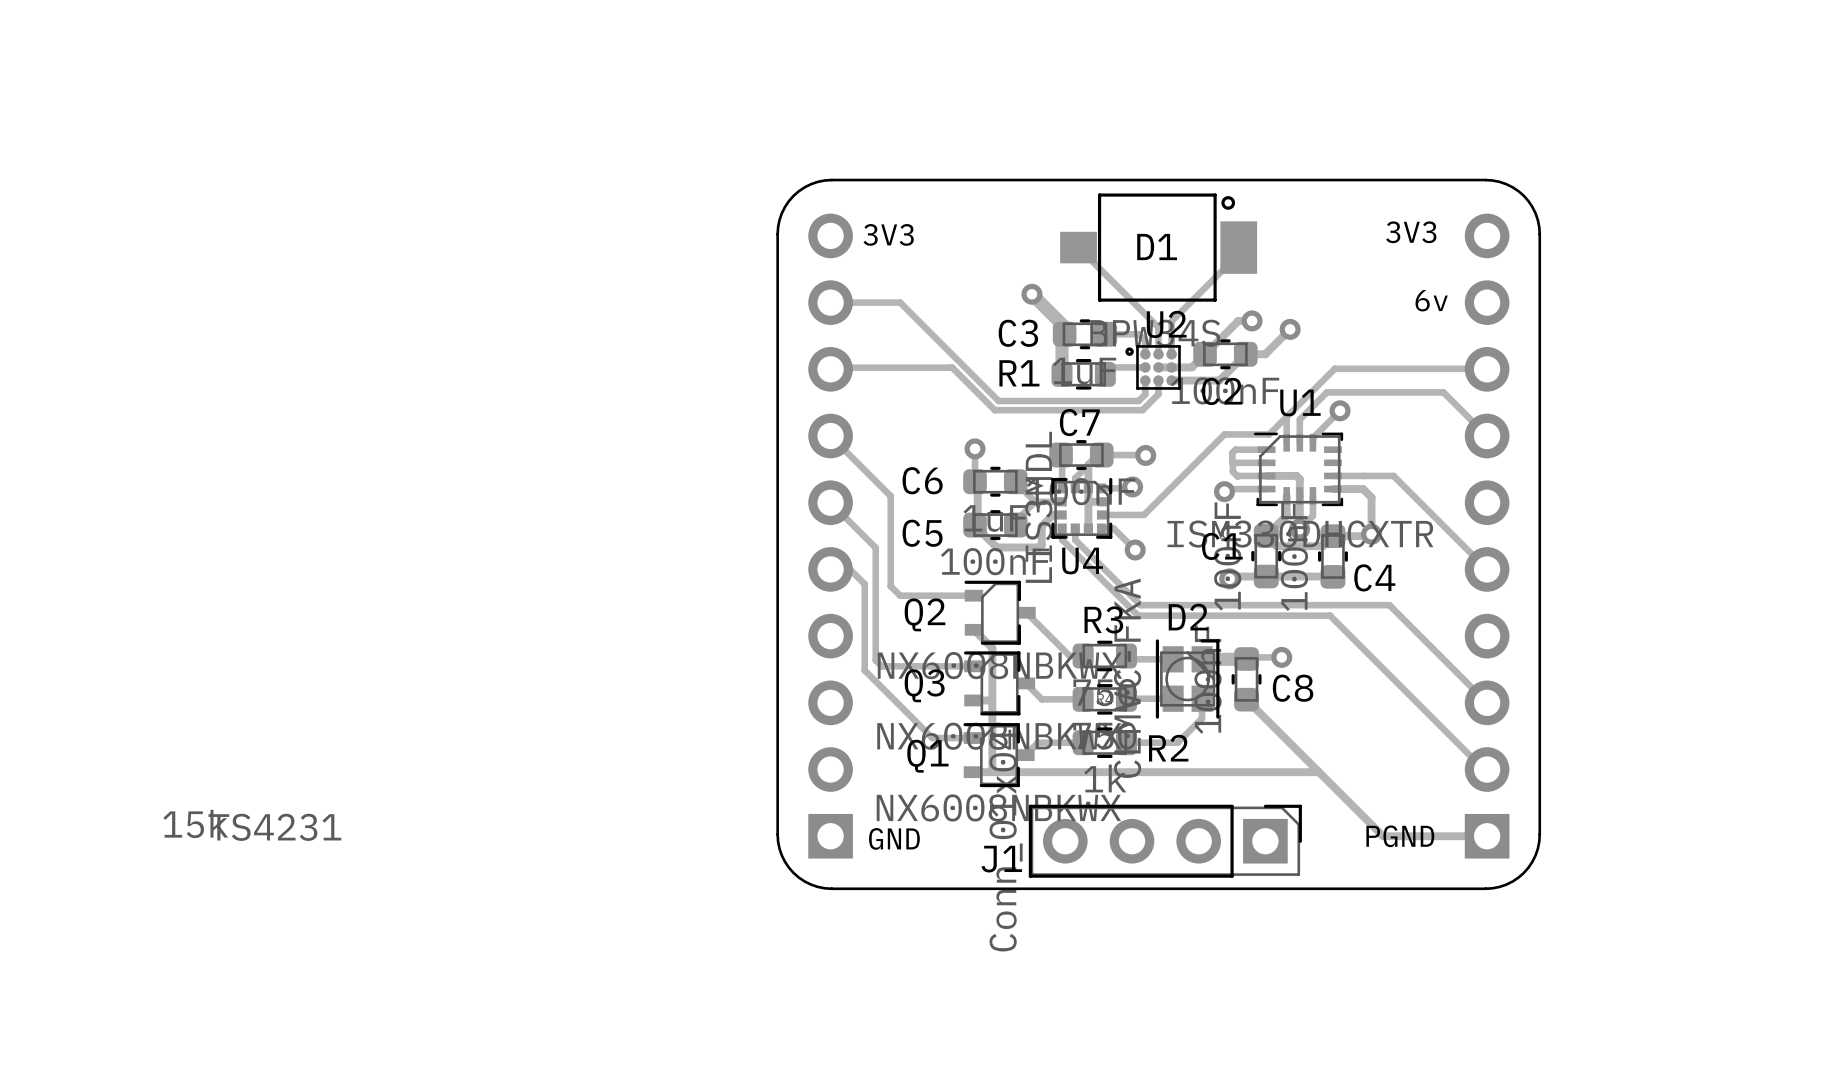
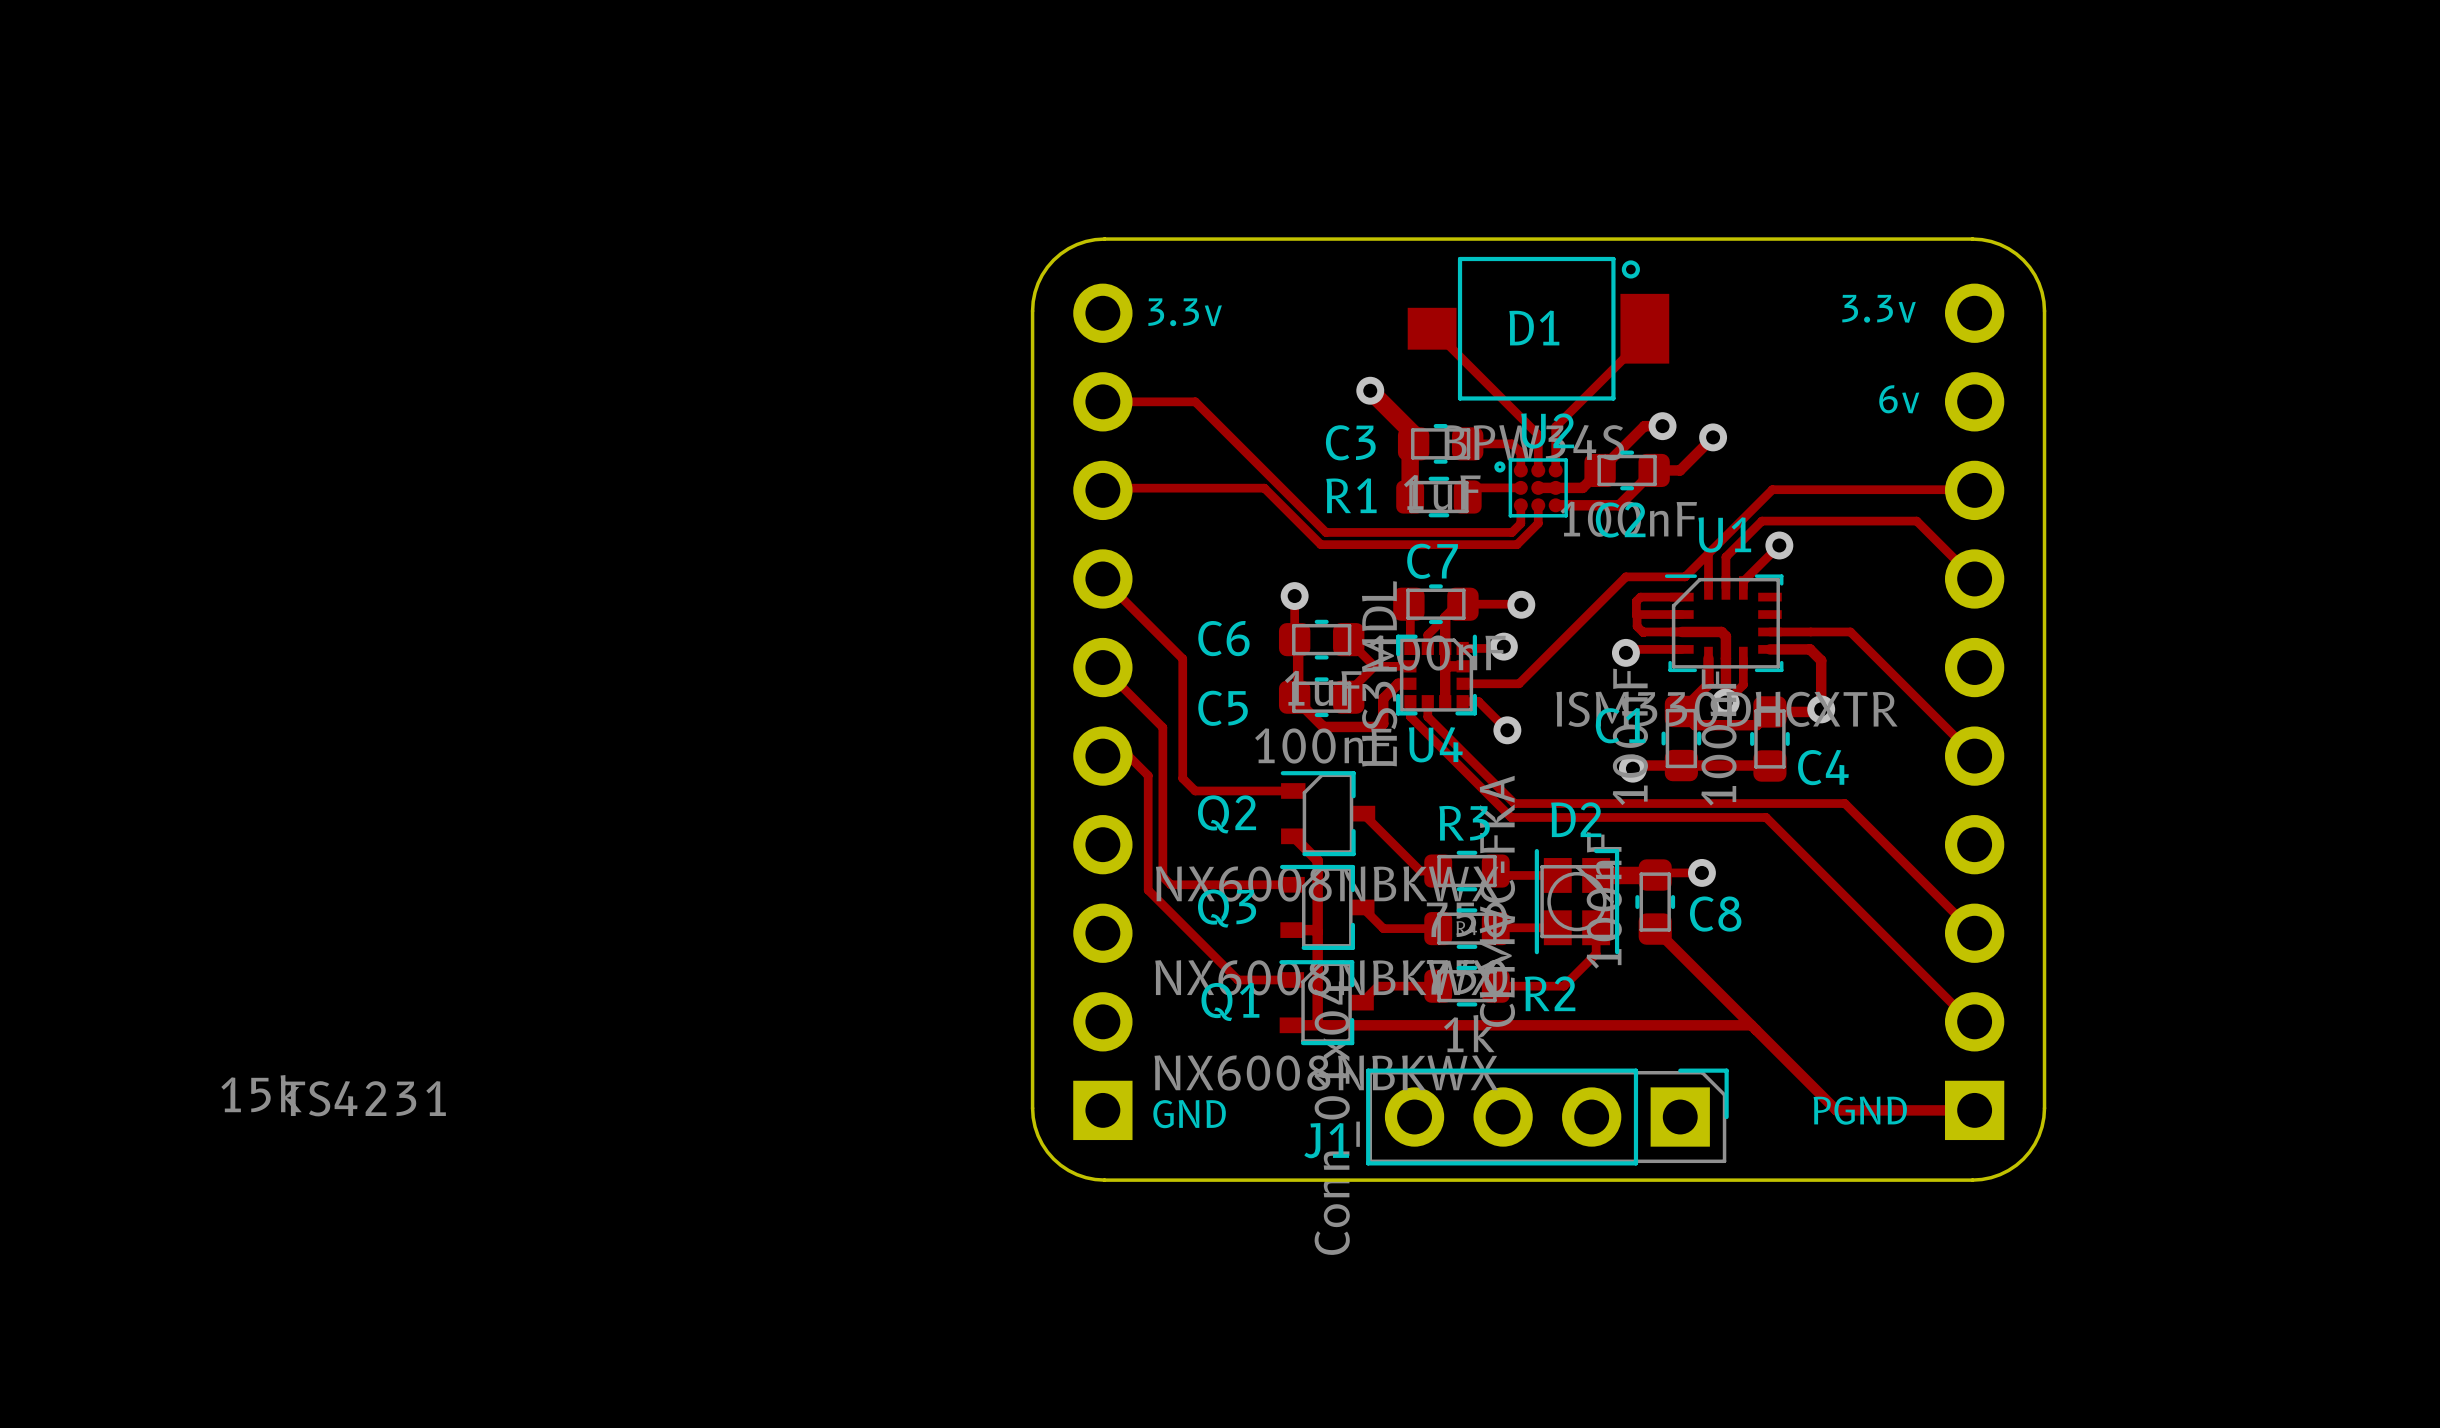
text: 3V3 (1411, 232) -> 3.3v (1879, 308)
text: 3V3 (888, 234) -> 3.3v (1185, 312)

